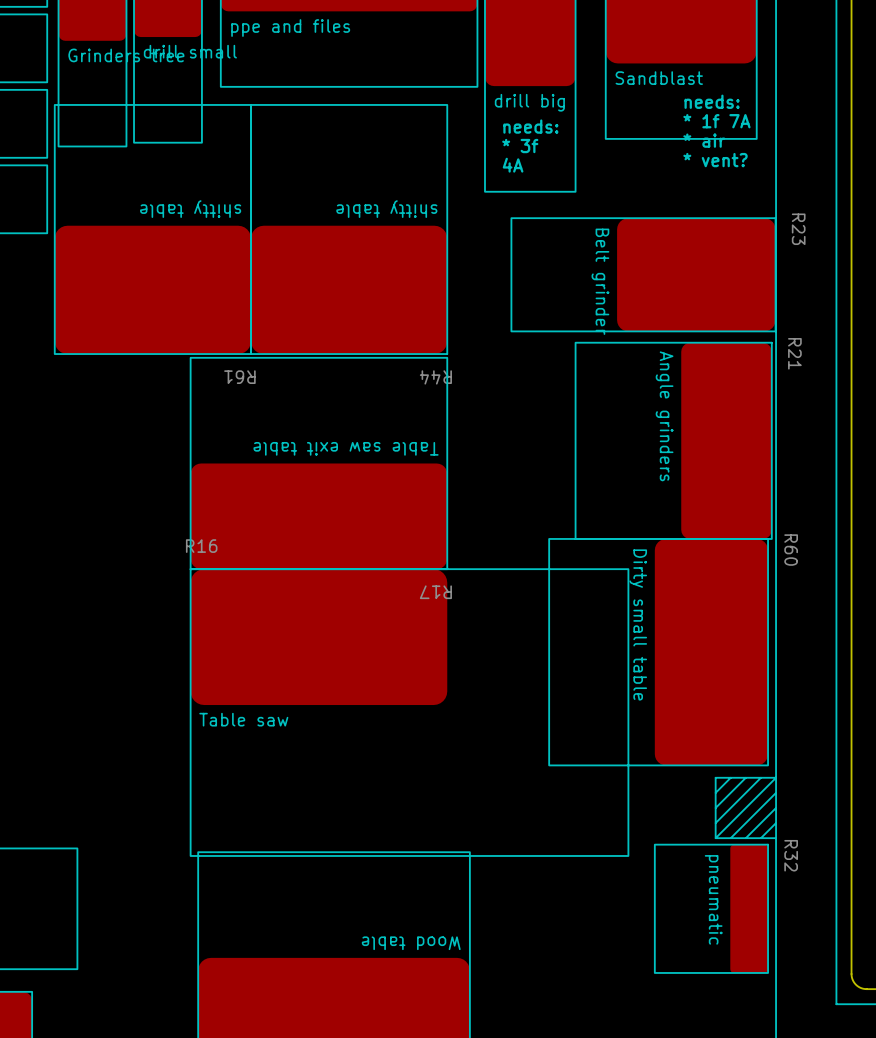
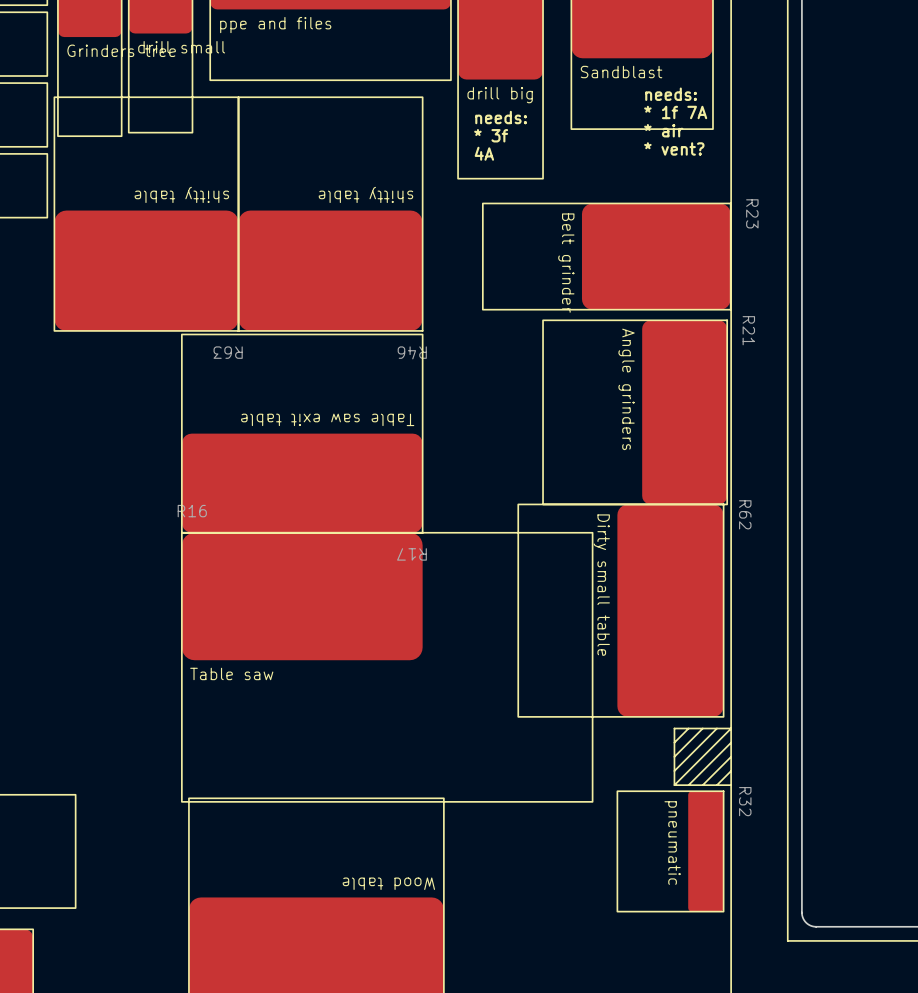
R61 name: R61 (239, 377) -> R63 (228, 352)
R44 name: R44 (435, 377) -> R46 (412, 352)
R60 name: R60 (791, 550) -> R62 (745, 514)

